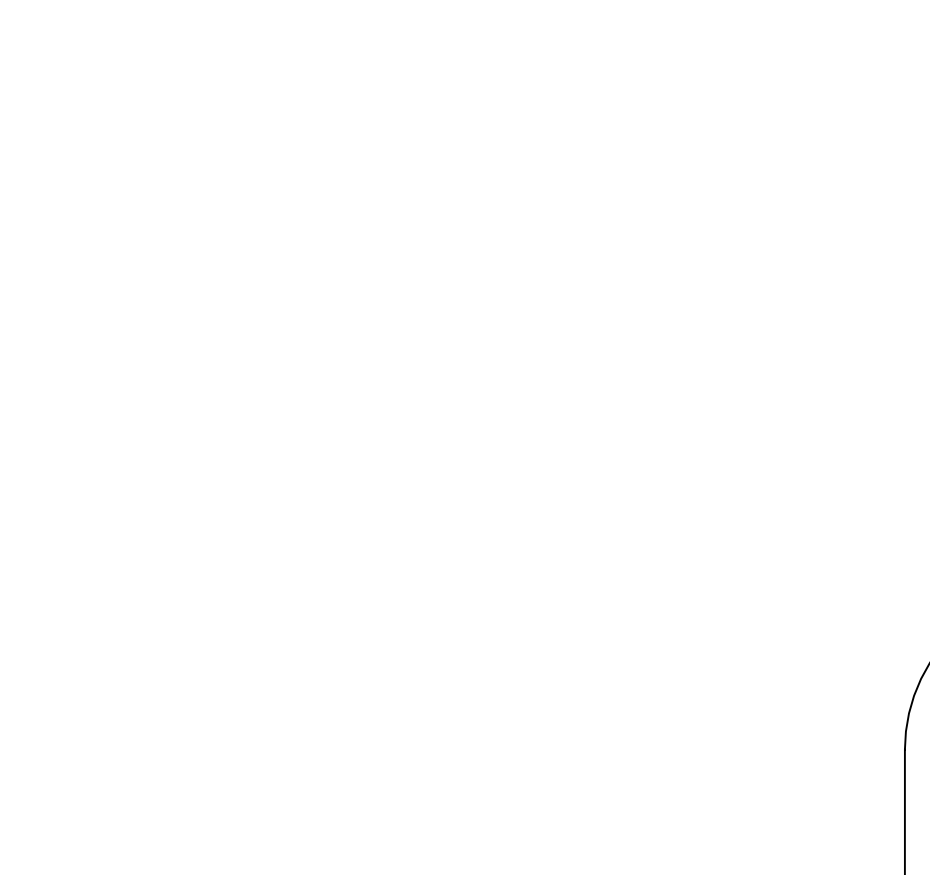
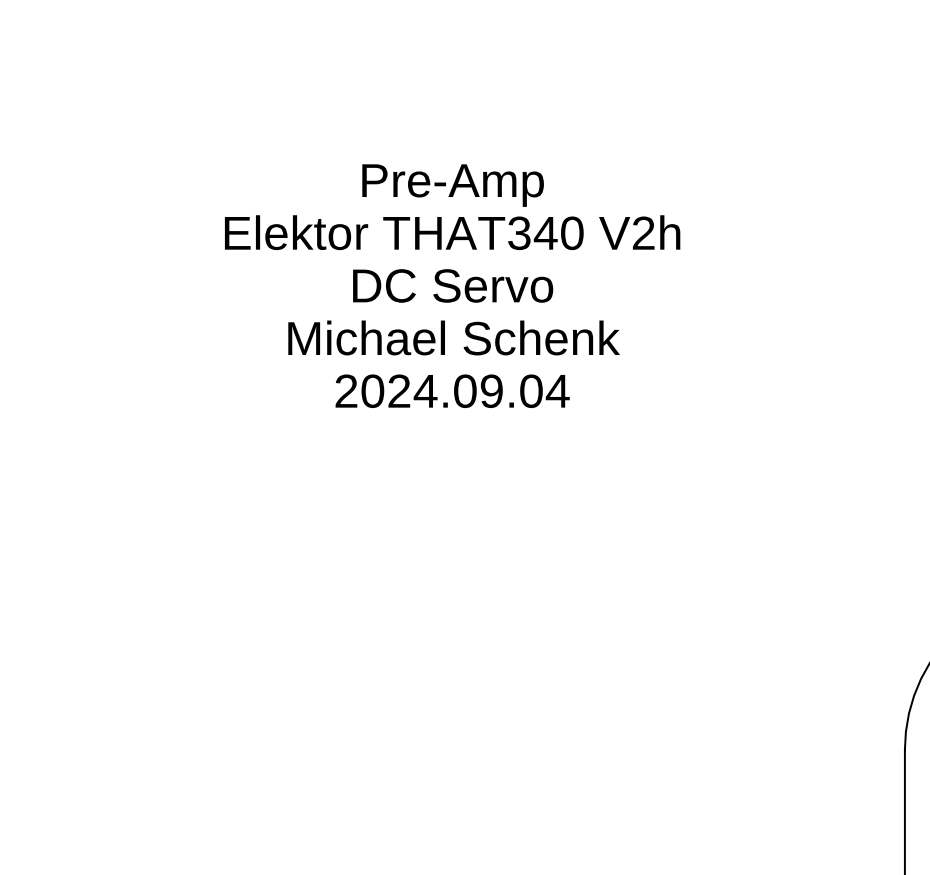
text: none -> Pre-Amp (453, 185)
text: none -> Elektor THAT340 V2h (452, 232)
text: none -> DC Servo (453, 285)
text: none -> Michael Schenk (454, 337)
text: none -> 2024.09.04 (452, 391)

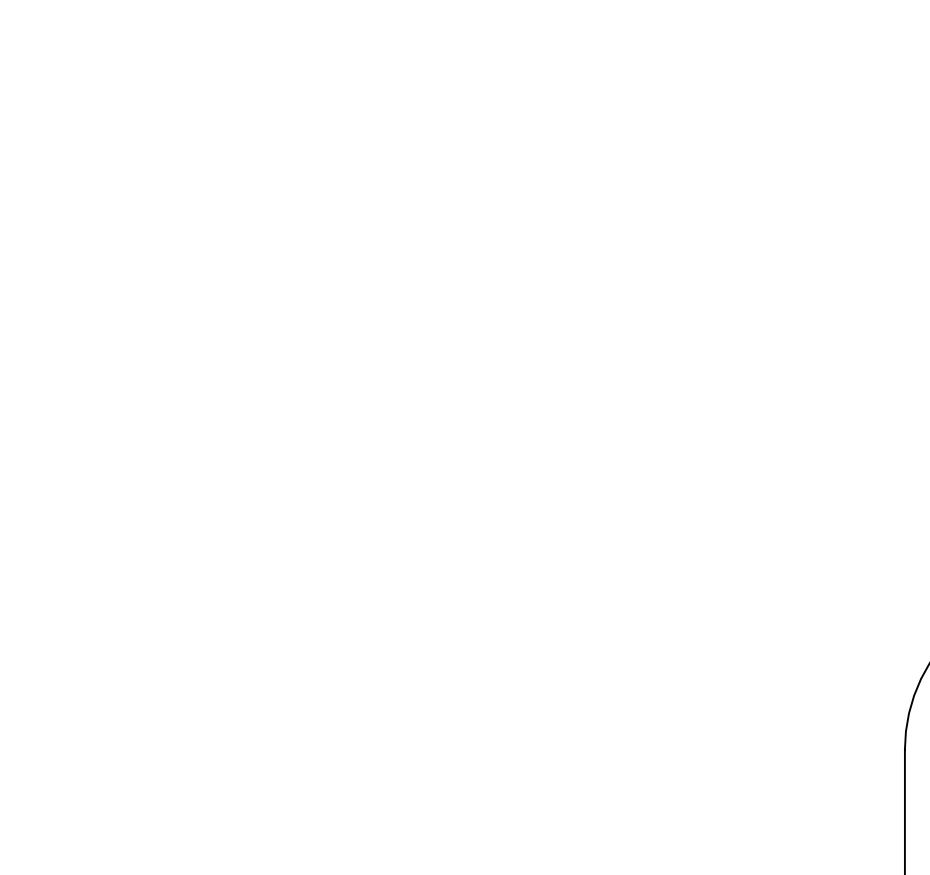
text: Pre-Amp (453, 185) -> none
text: Elektor THAT340 V2h (452, 232) -> none
text: DC Servo (453, 285) -> none
text: Michael Schenk (454, 337) -> none
text: 2024.09.04 (452, 391) -> none

